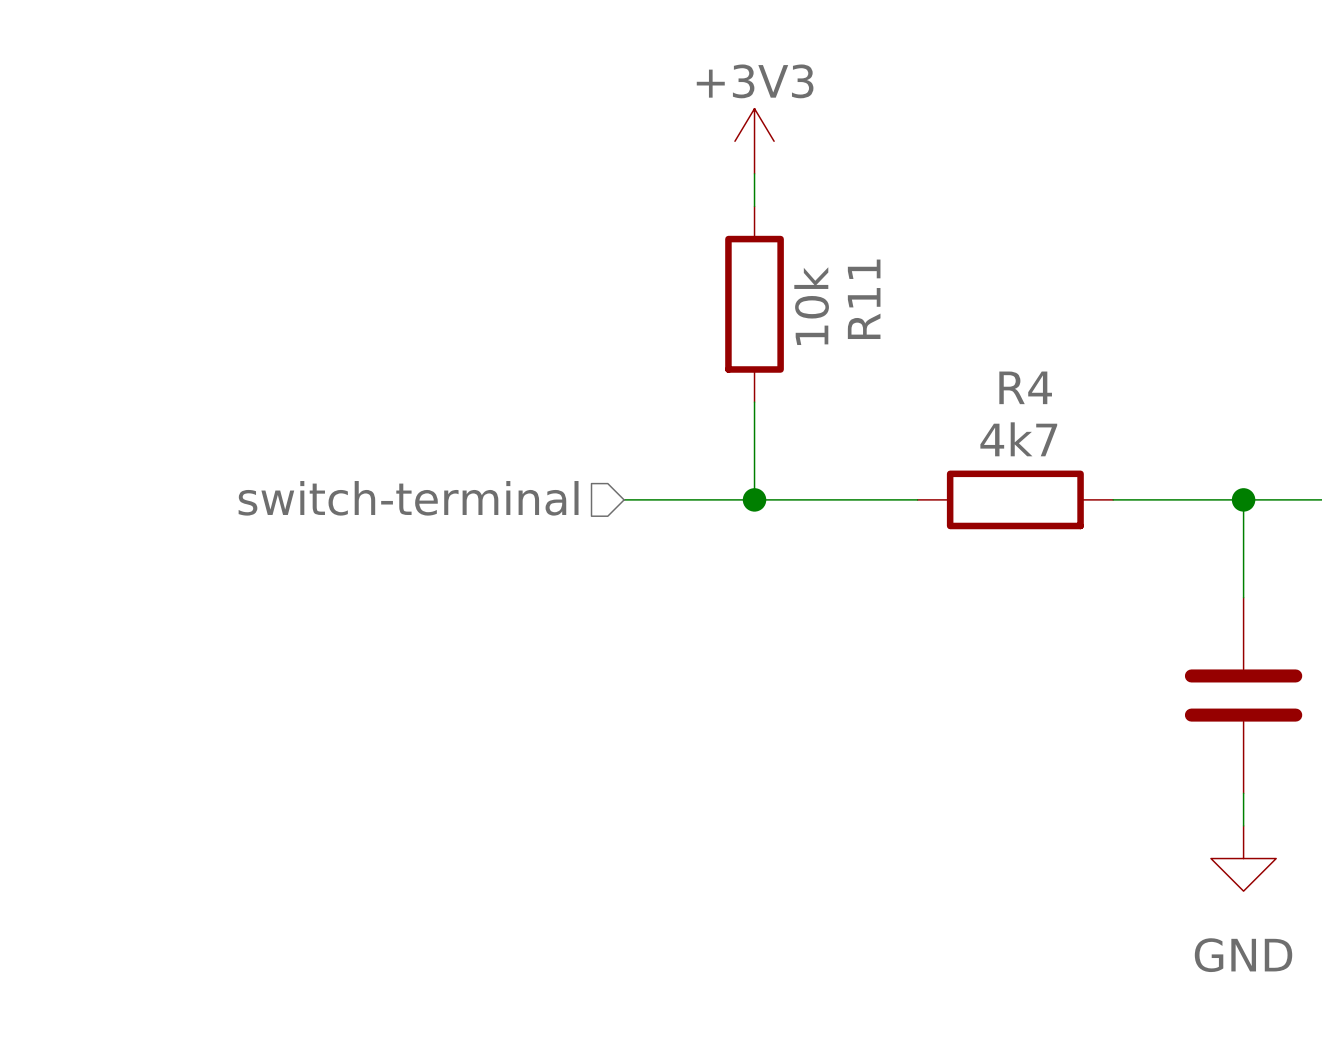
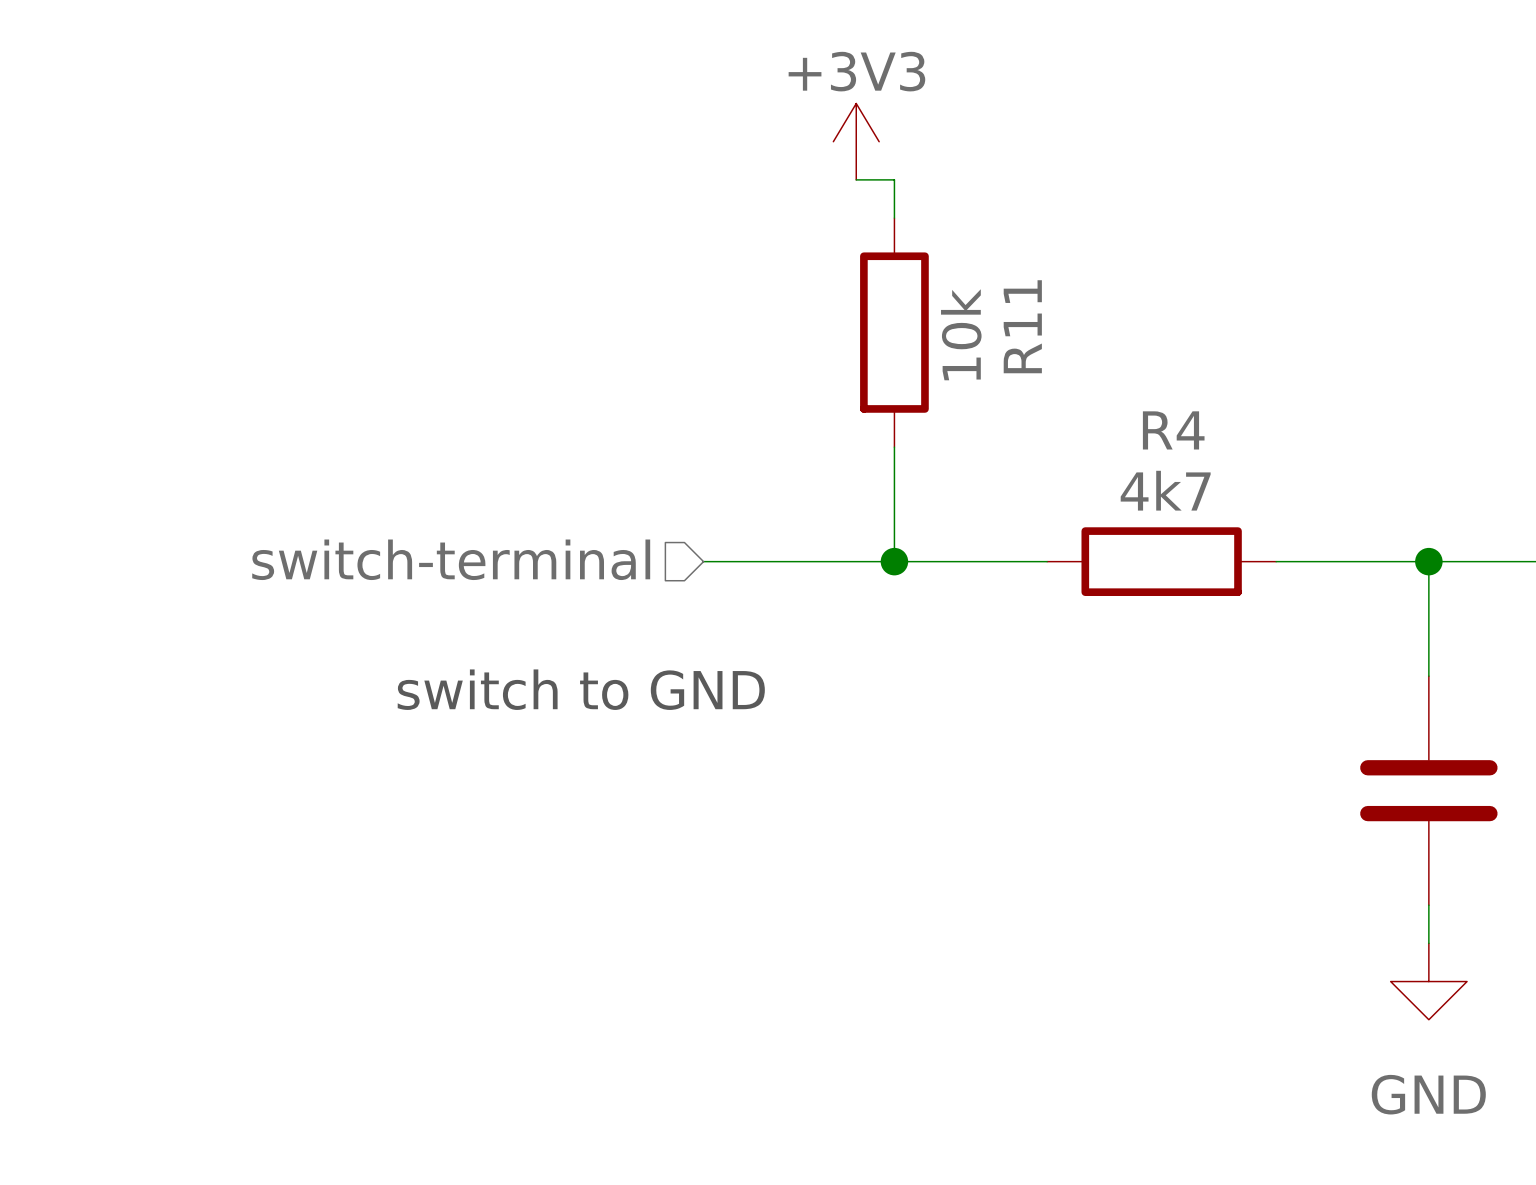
wire: (754, 173) (754, 206) -> (856, 179) (894, 179) (894, 218)
R11 position: (754, 304) -> (894, 332)
wire: (754, 402) (754, 499) -> (894, 447) (894, 561)
junction position: (754, 499) -> (894, 561)
text: none -> switch to GND (581, 689)

